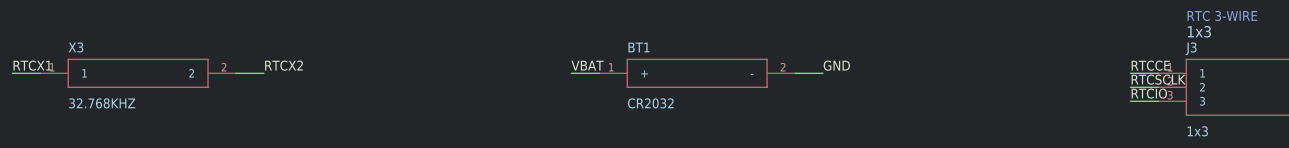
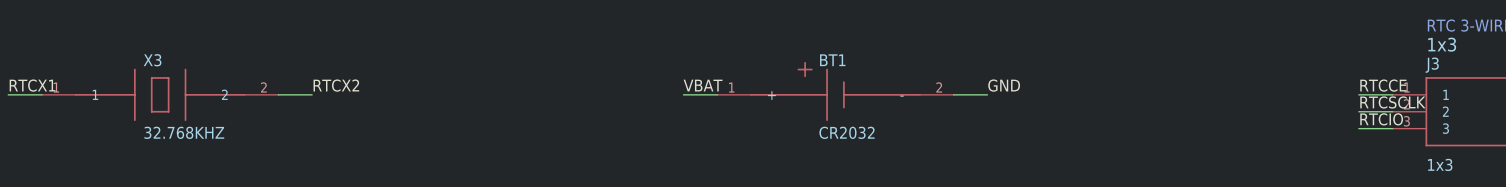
X3 name position: X3 (75, 47) -> X3 (152, 60)
BT1 name position: BT1 (639, 47) -> BT1 (832, 60)
X3 symbol: [40, 58, 236, 89] -> [42, 68, 279, 122]
BT1 symbol: [599, 58, 796, 89] -> [717, 61, 954, 122]
X3 value position: 32.768KHZ (102, 103) -> 32.768KHZ (184, 132)
BT1 value position: CR2032 (650, 103) -> CR2032 (847, 132)

